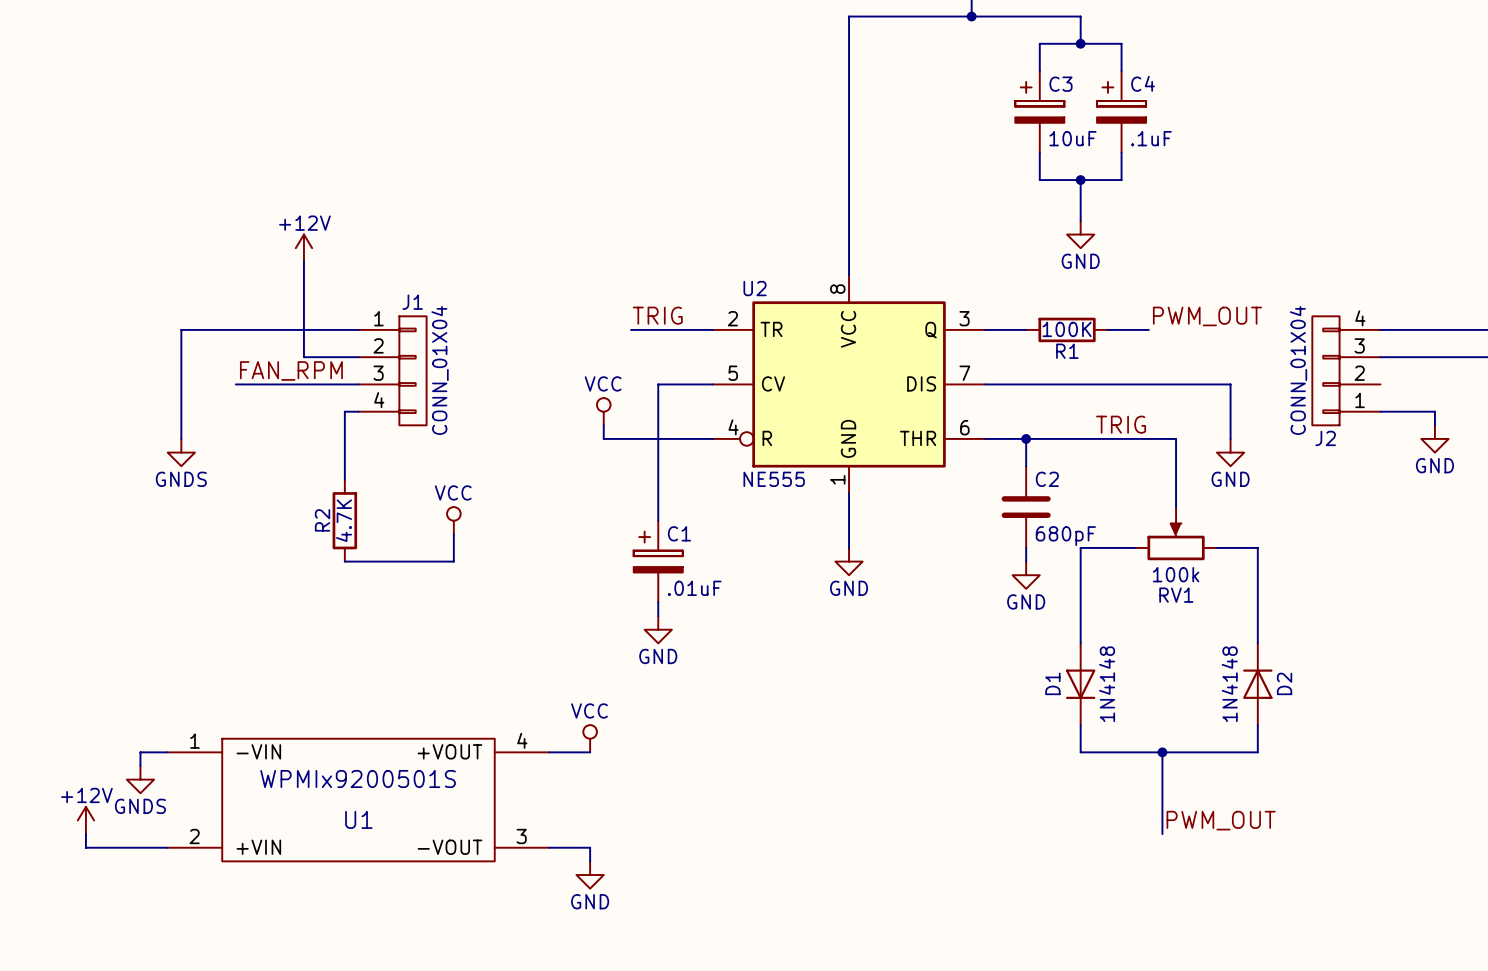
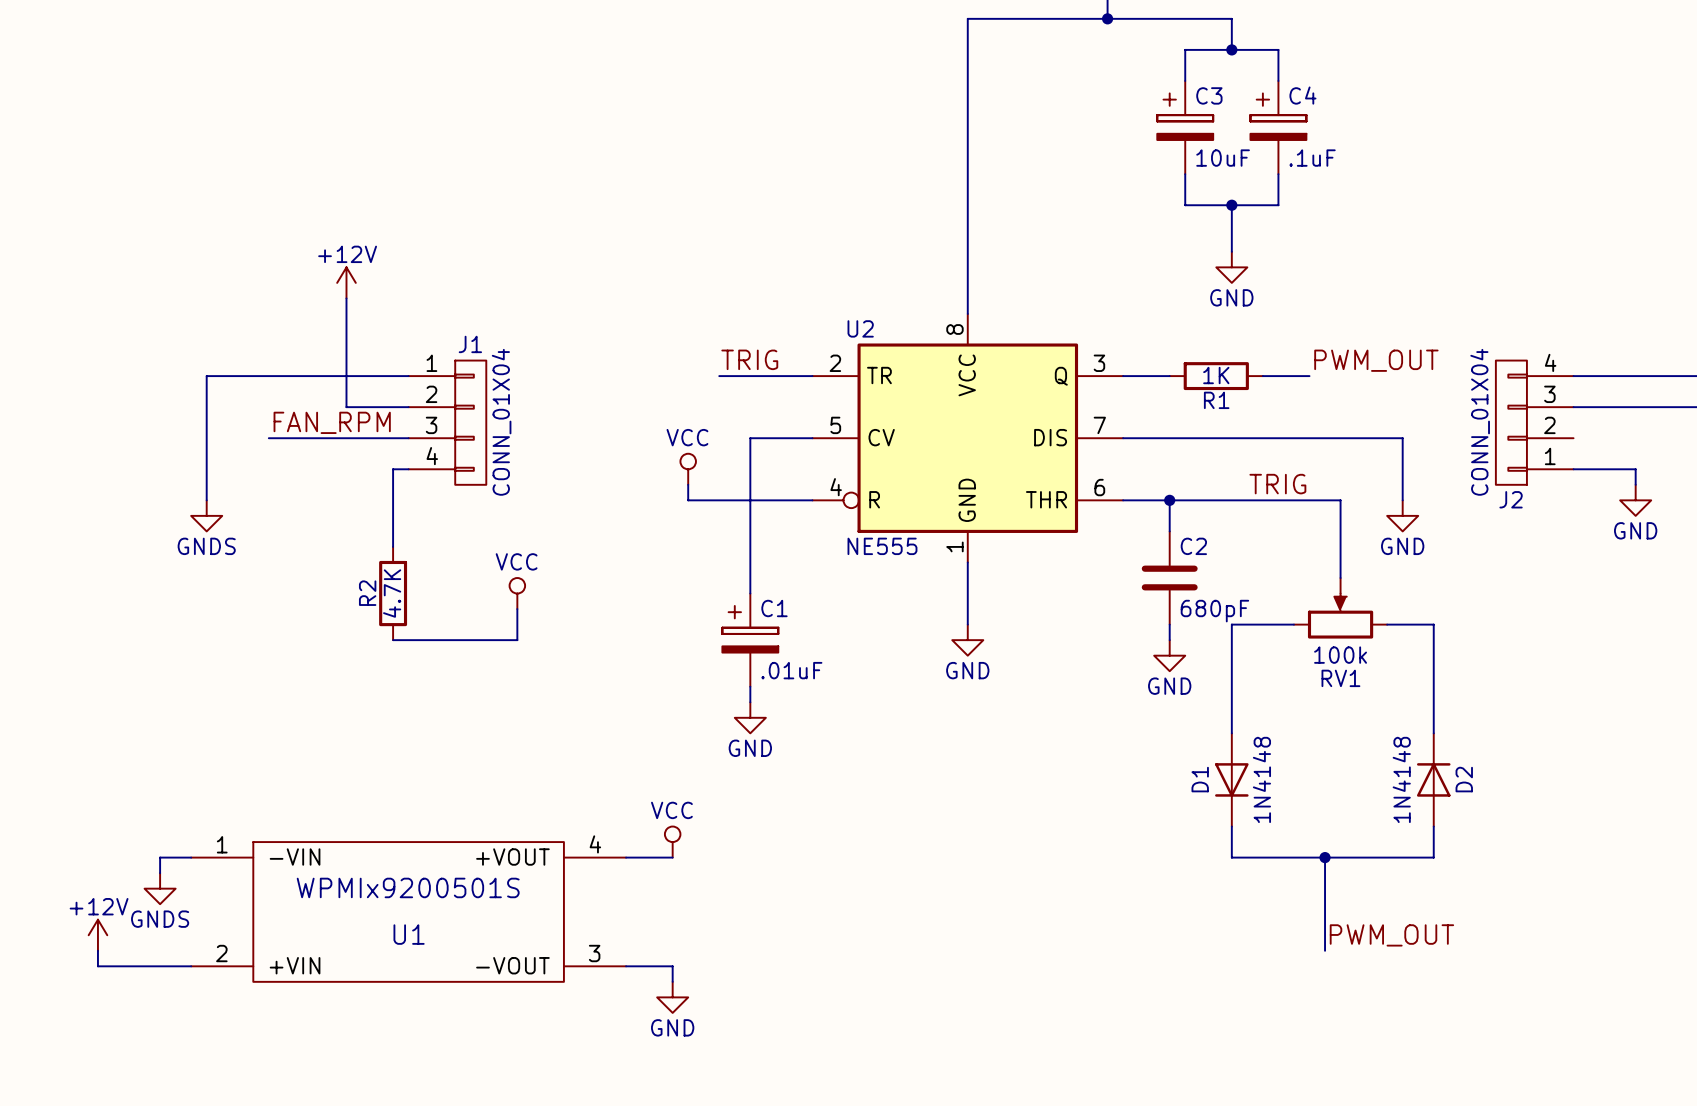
R1 value: 100K (1067, 329) -> 1K (1216, 375)

